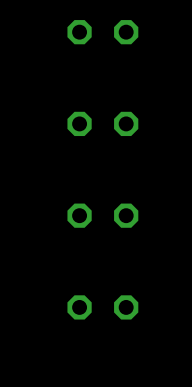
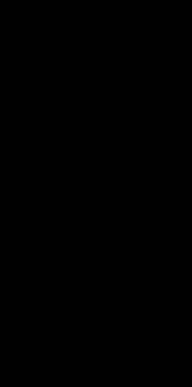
part: (102, 32) -> none
part: (102, 123) -> none
part: (102, 215) -> none
part: (102, 307) -> none

